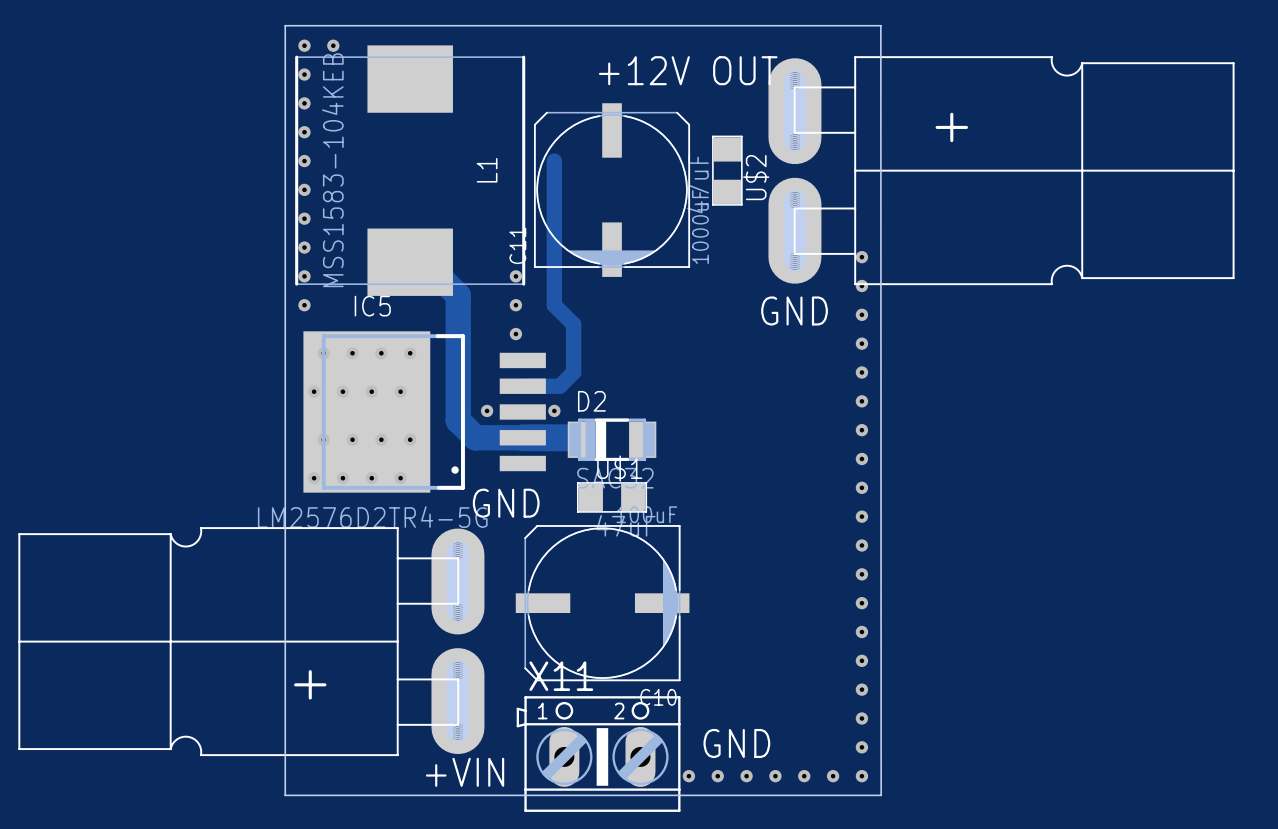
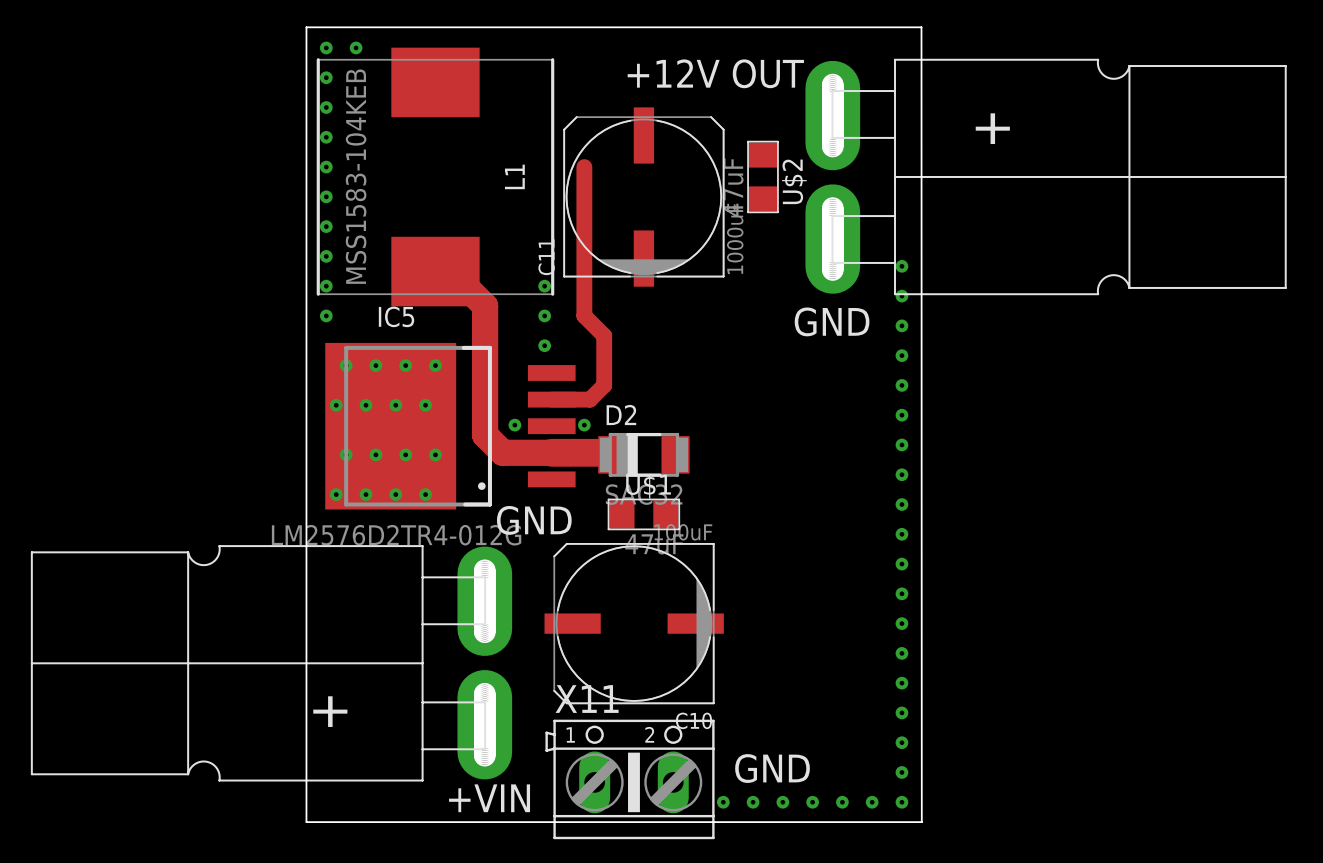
IC5 value: LM2576D2TR4-5G (372, 517) -> LM2576D2TR4-012G (396, 535)

